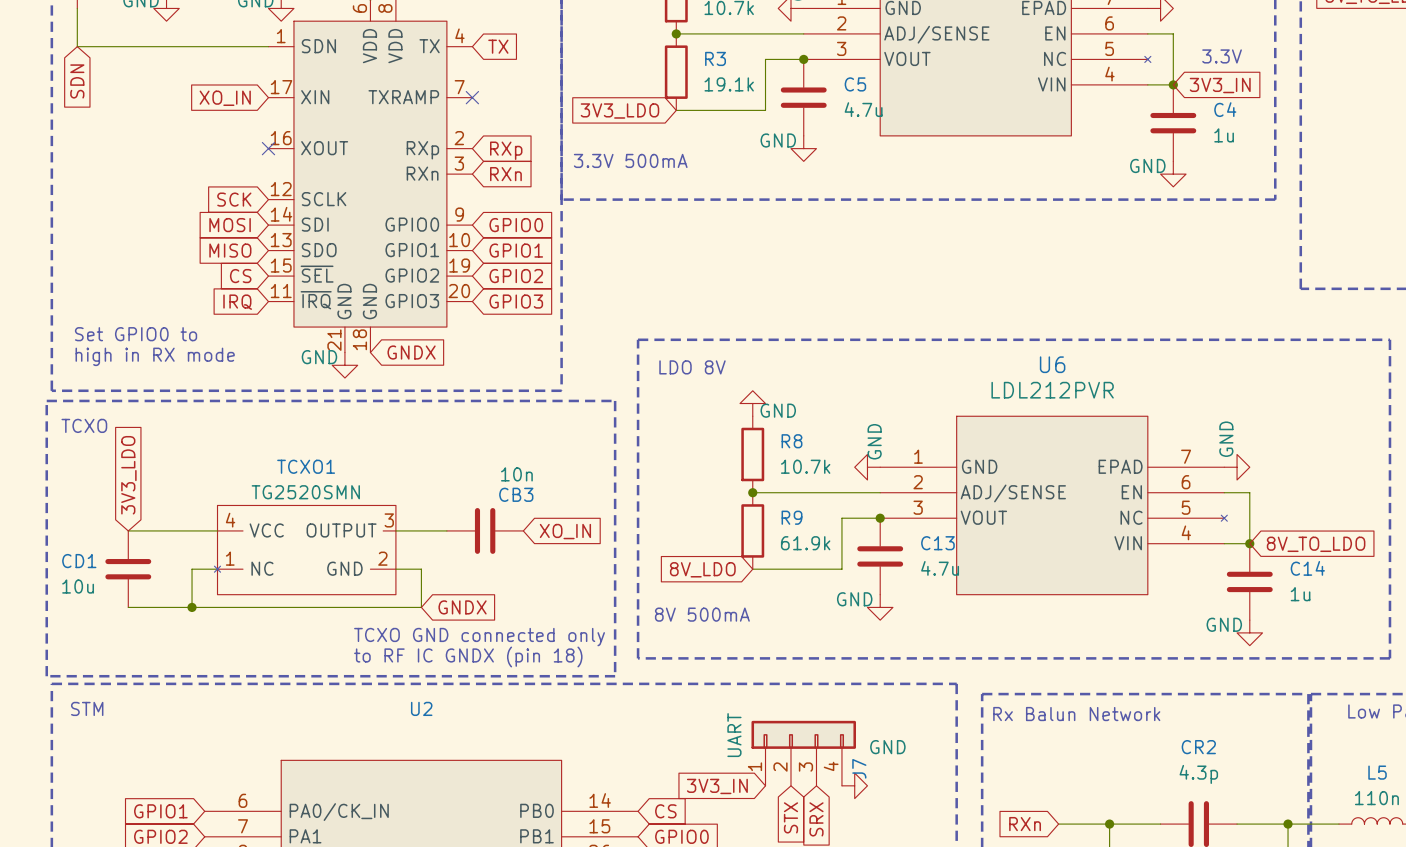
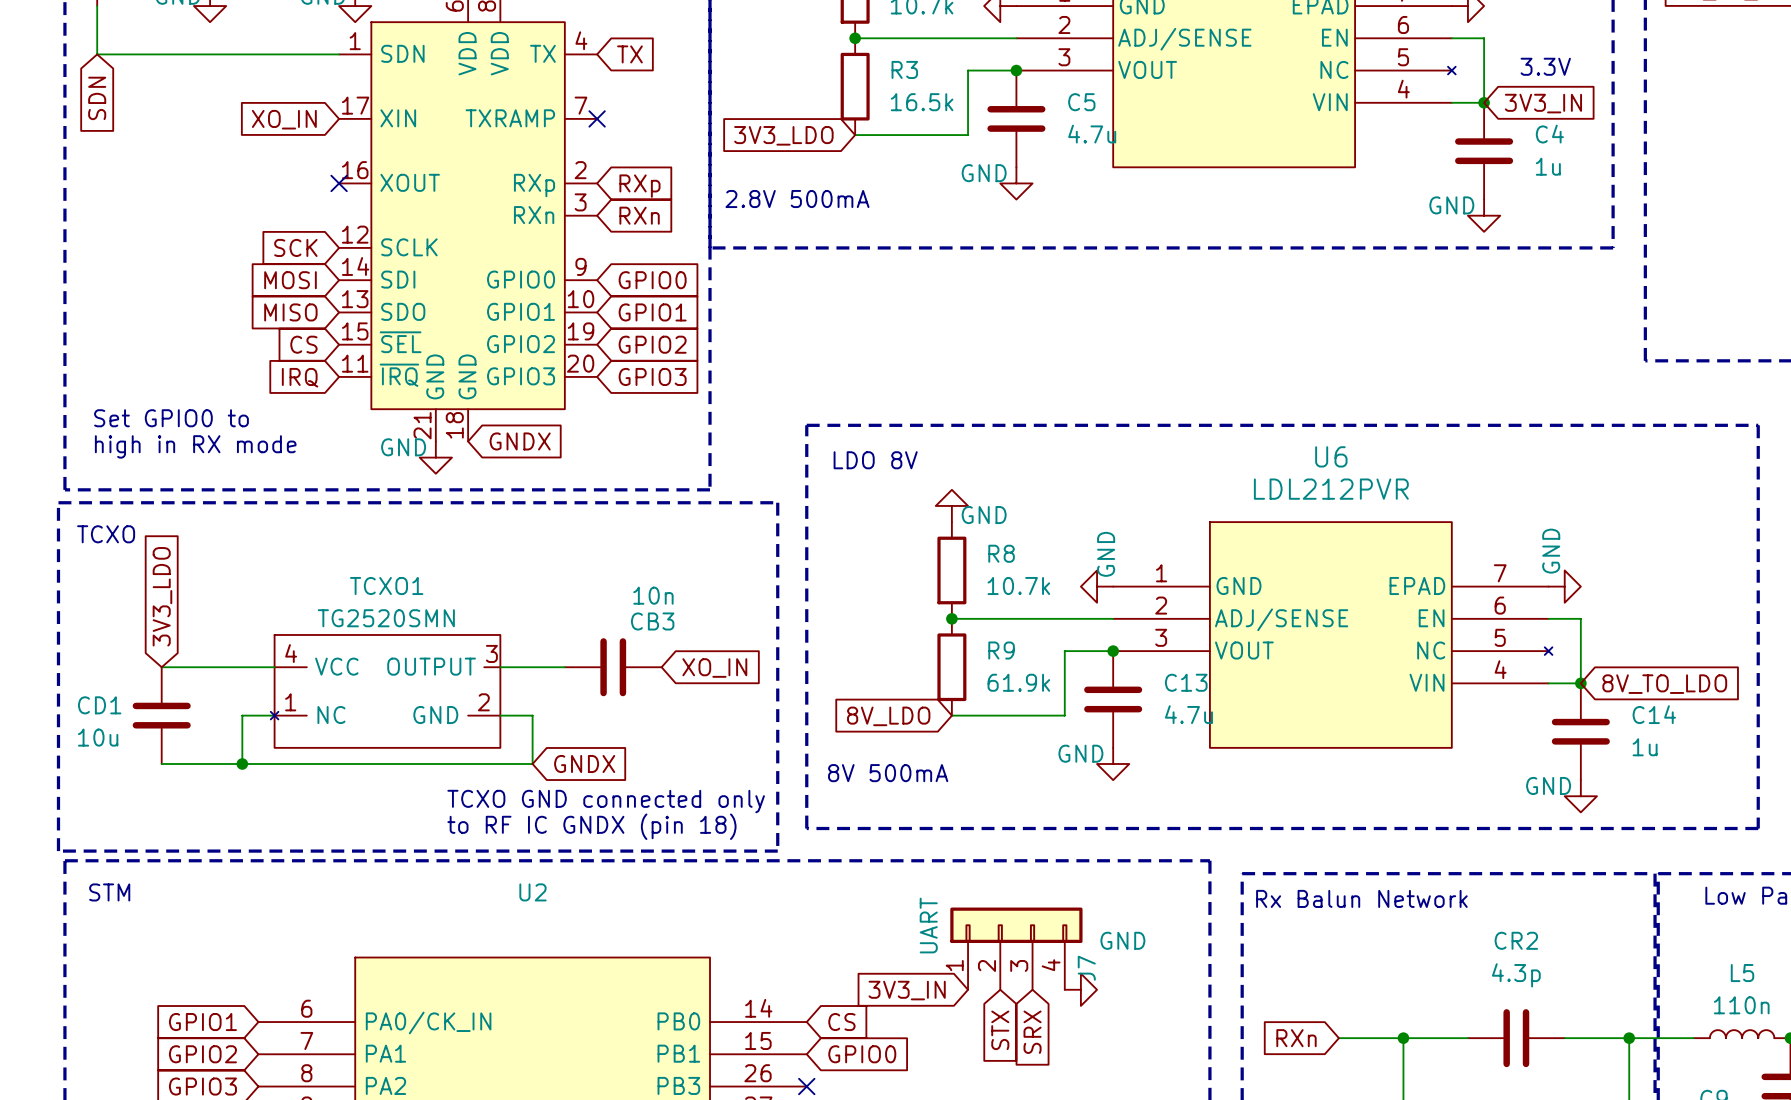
R3 value: 19.1k (729, 84) -> 16.5k (922, 102)
text: 3.3V 500mA (630, 160) -> 2.8V 500mA (797, 199)

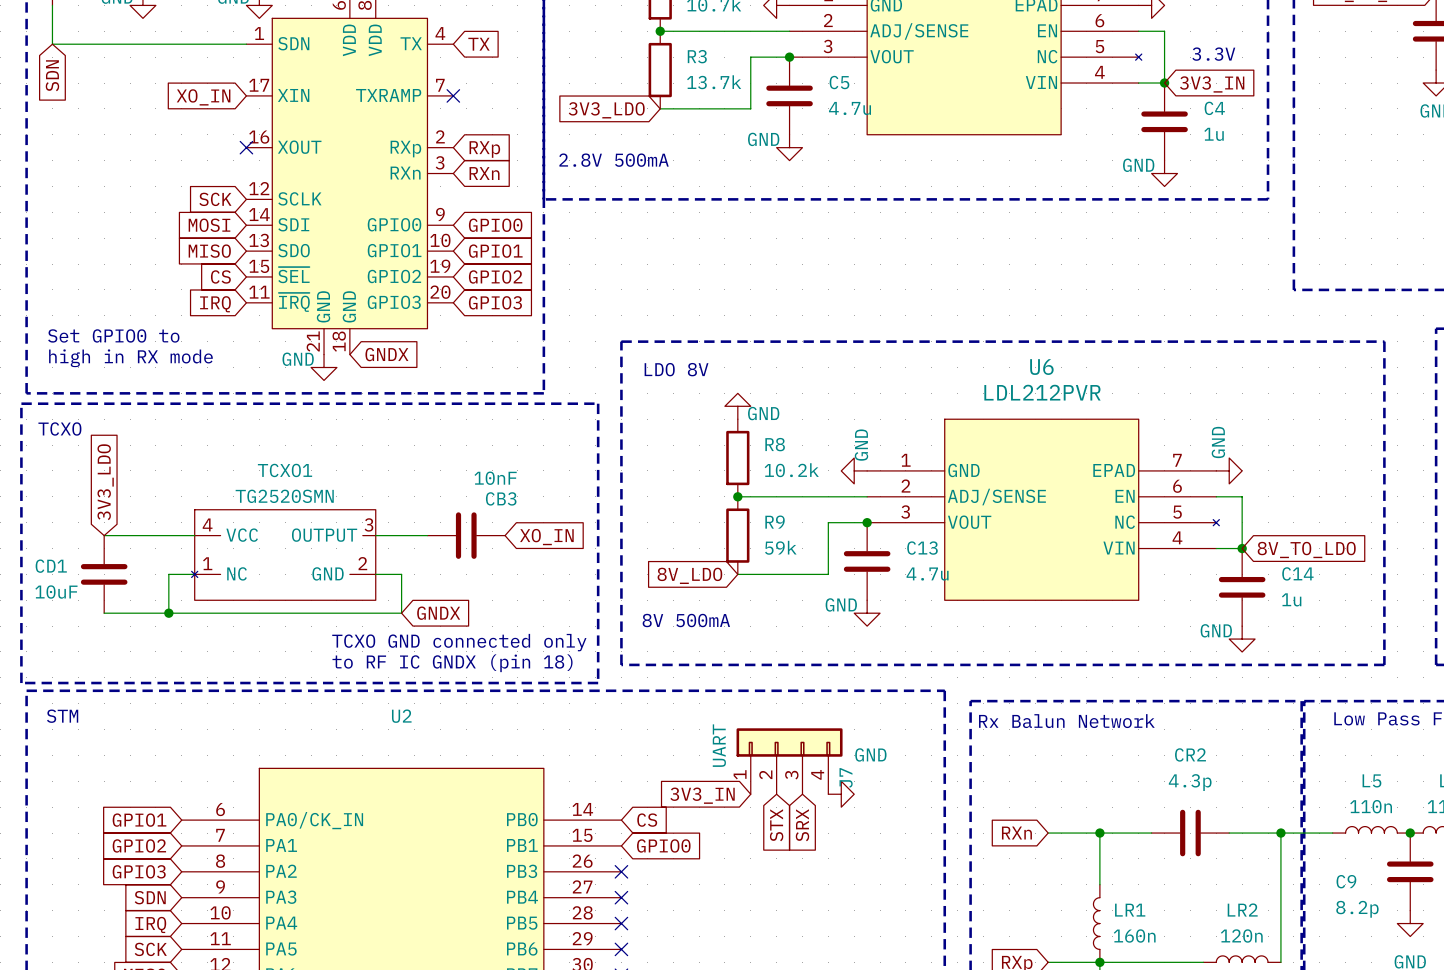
R3 value: 16.5k (922, 102) -> 13.7k (714, 82)
R8 value: 10.7k (1018, 586) -> 10.2k (791, 470)
CB3 value: 10n (653, 595) -> 10nF (495, 478)
R9 value: 61.9k (1018, 682) -> 59k (780, 547)
CD1 value: 10u (98, 737) -> 10uF (56, 592)

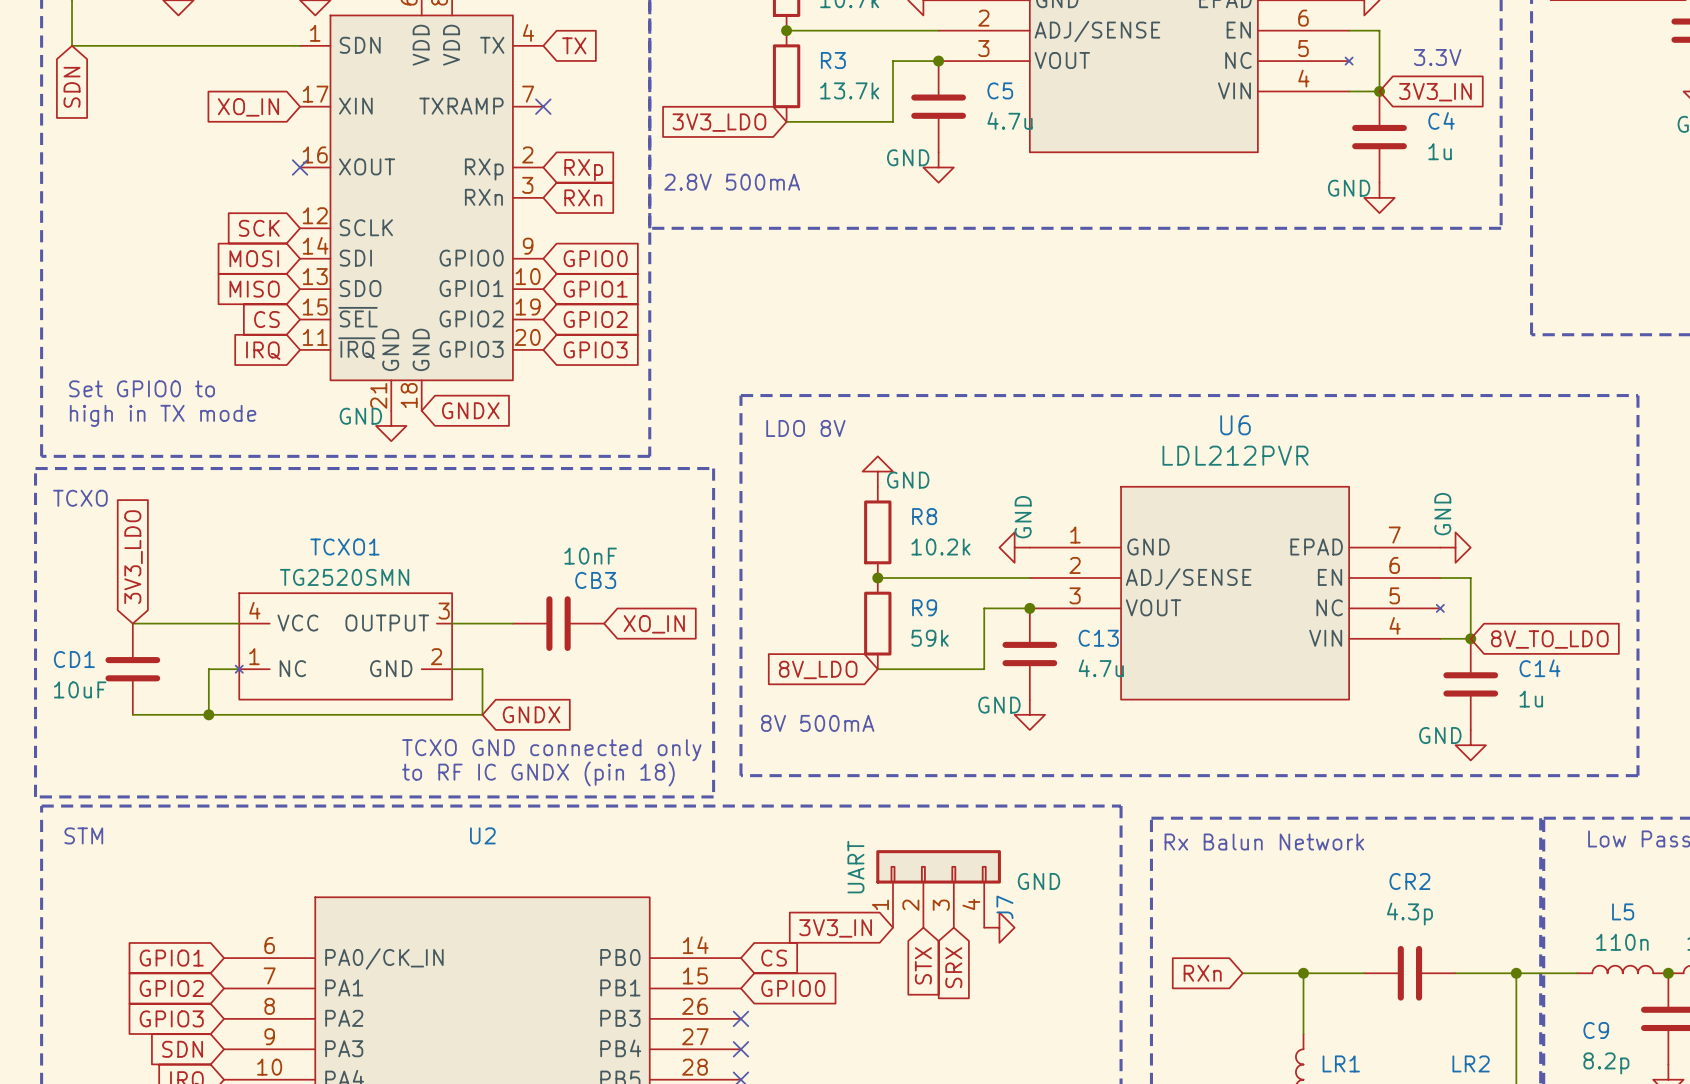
text: high in RX mode (130, 358) -> high in TX mode (163, 415)

